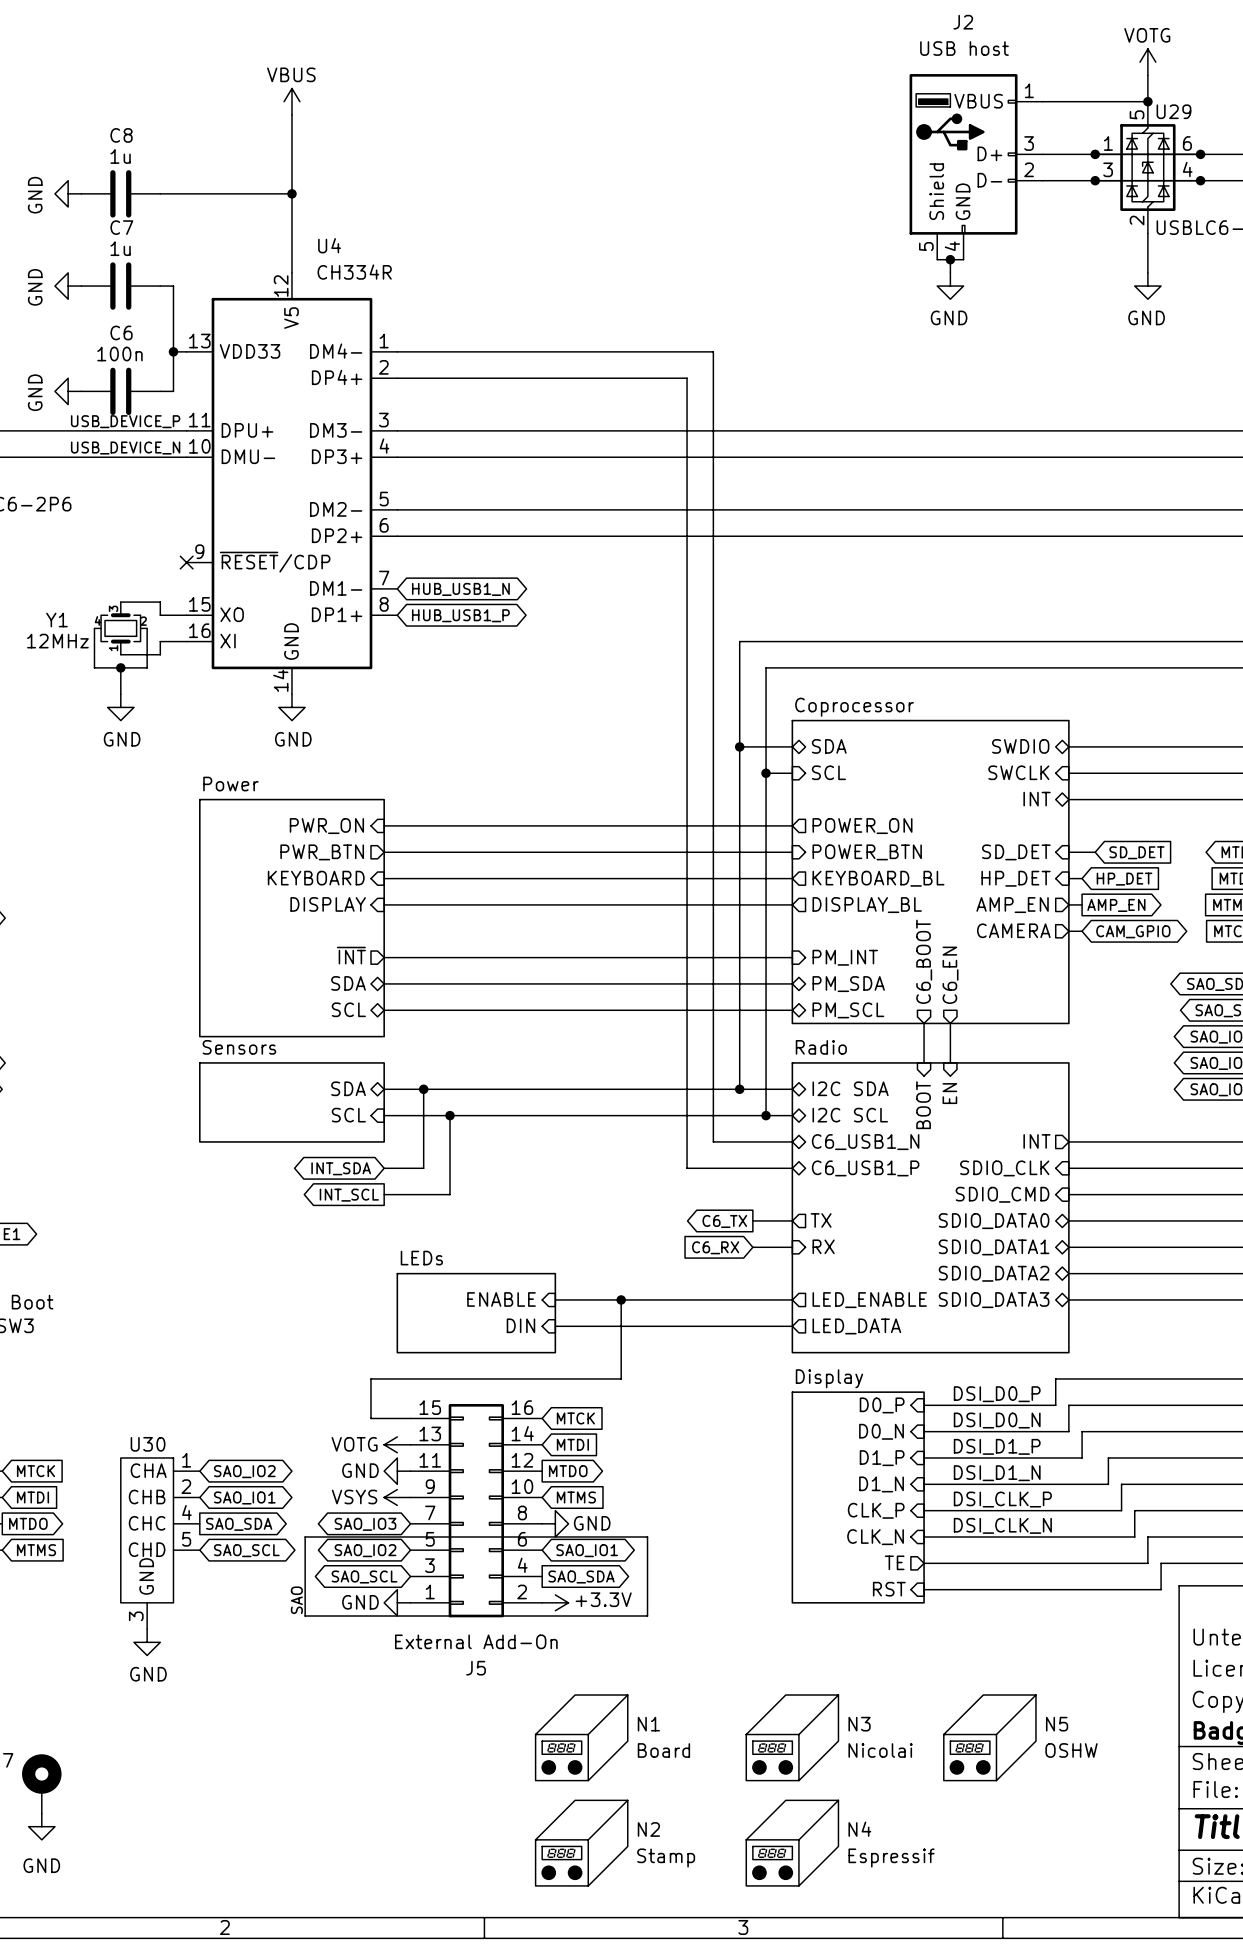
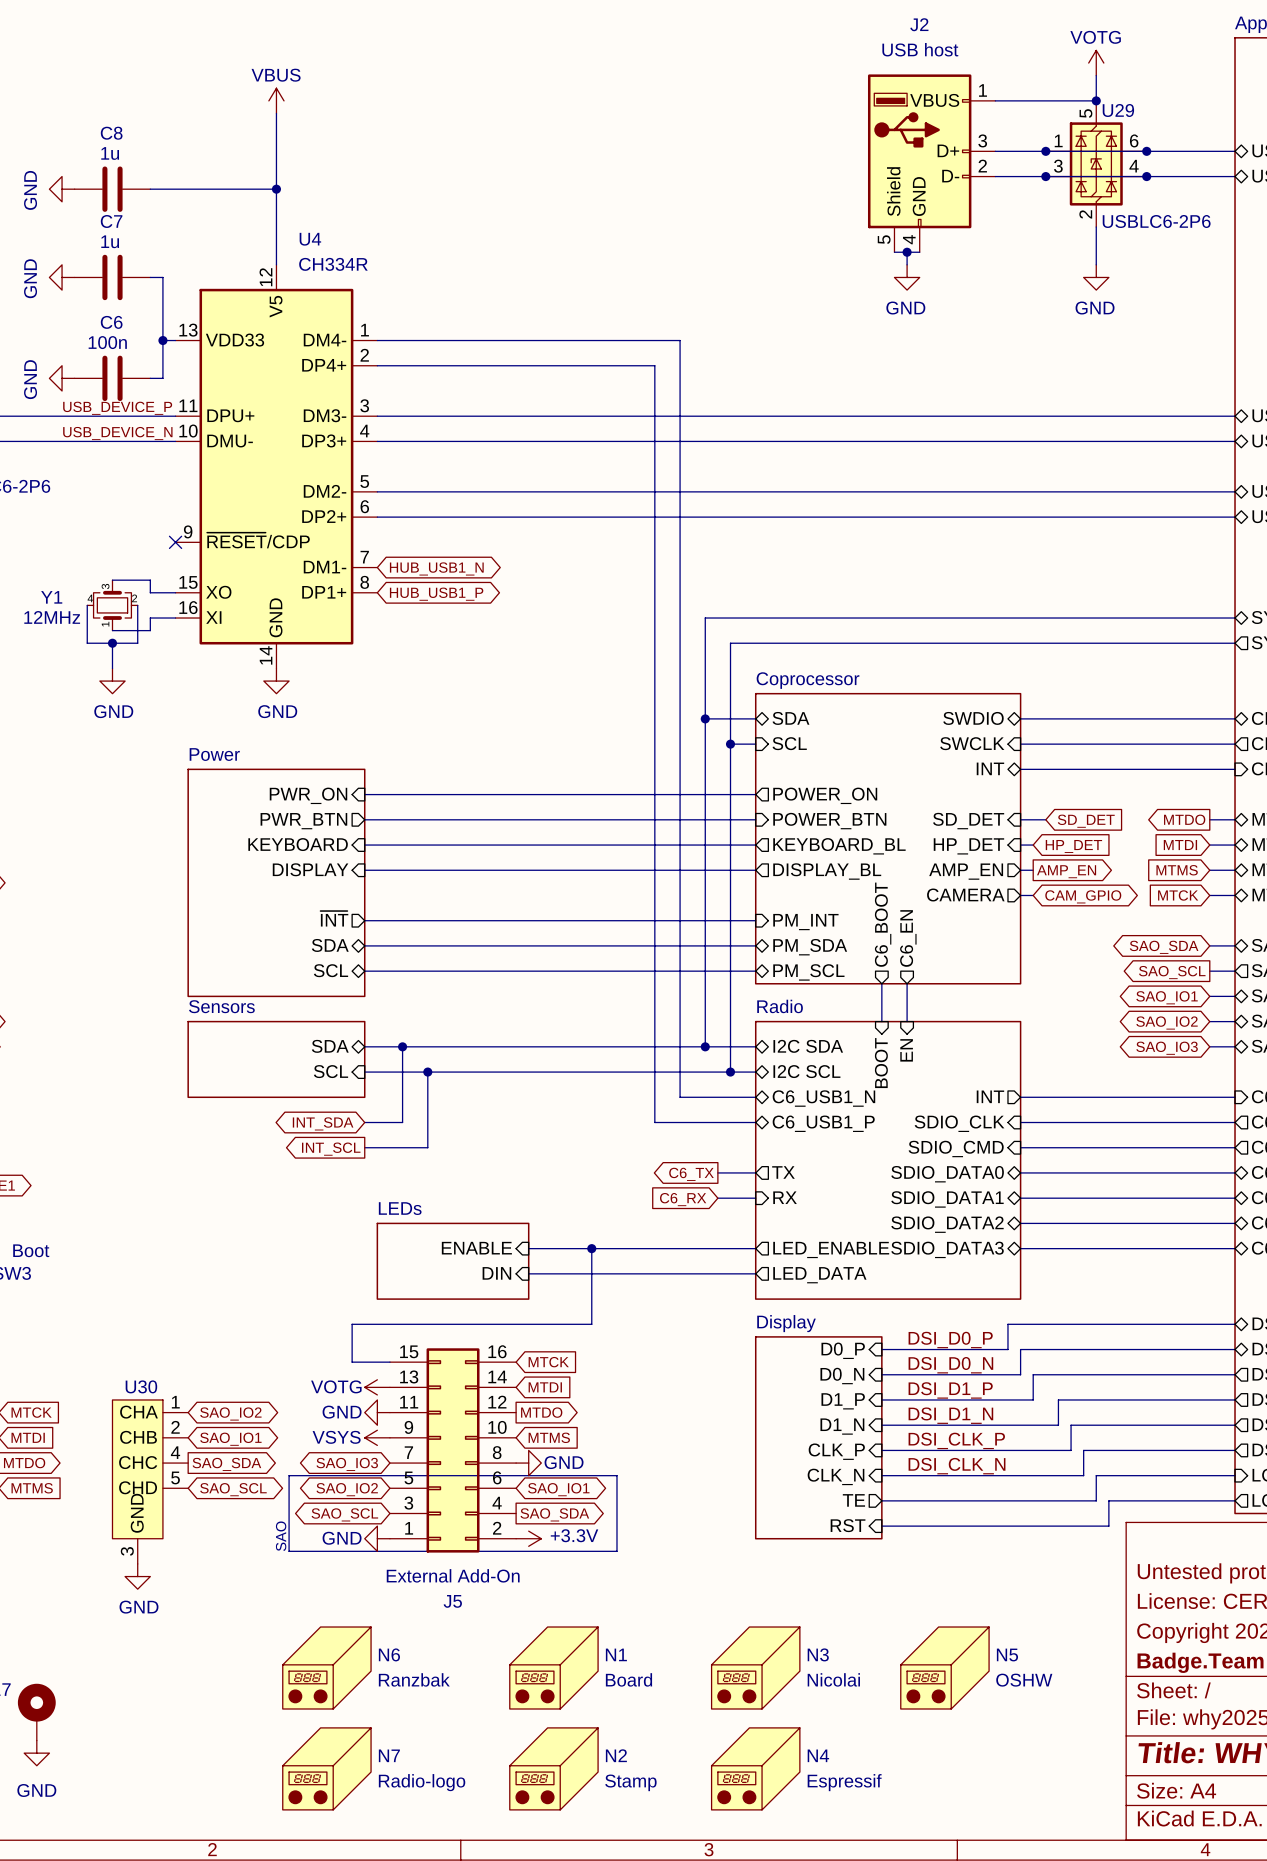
N6: none -> Ranzbak (326, 1668)
N7: none -> Radio-logo (326, 1768)

